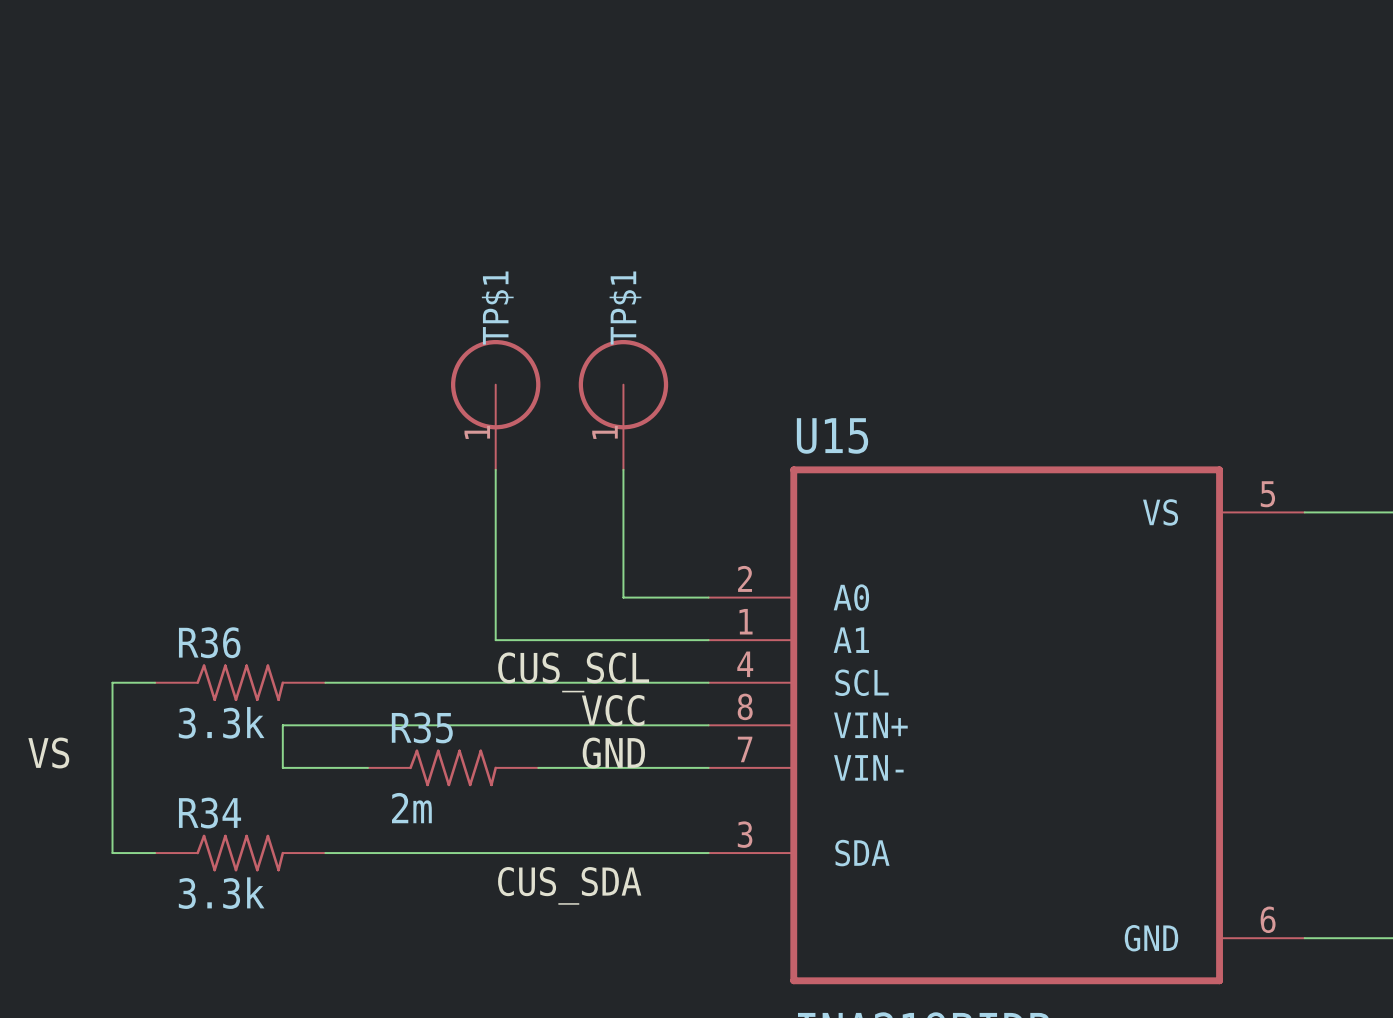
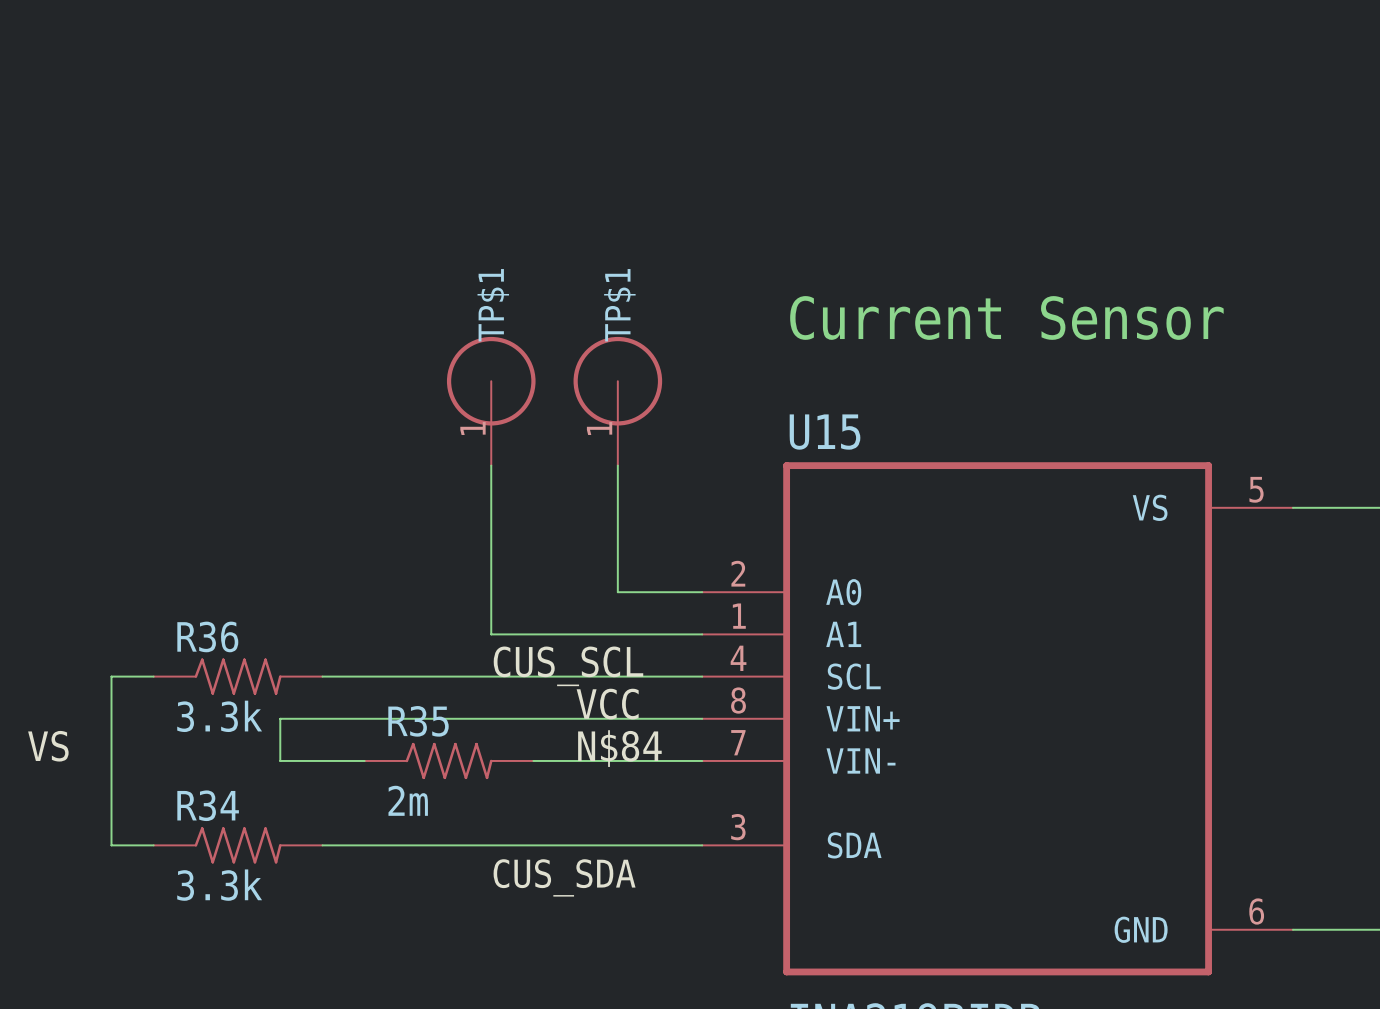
text: none -> Current Sensor (1006, 317)
label: GND (613, 753) -> N$84 (619, 748)

